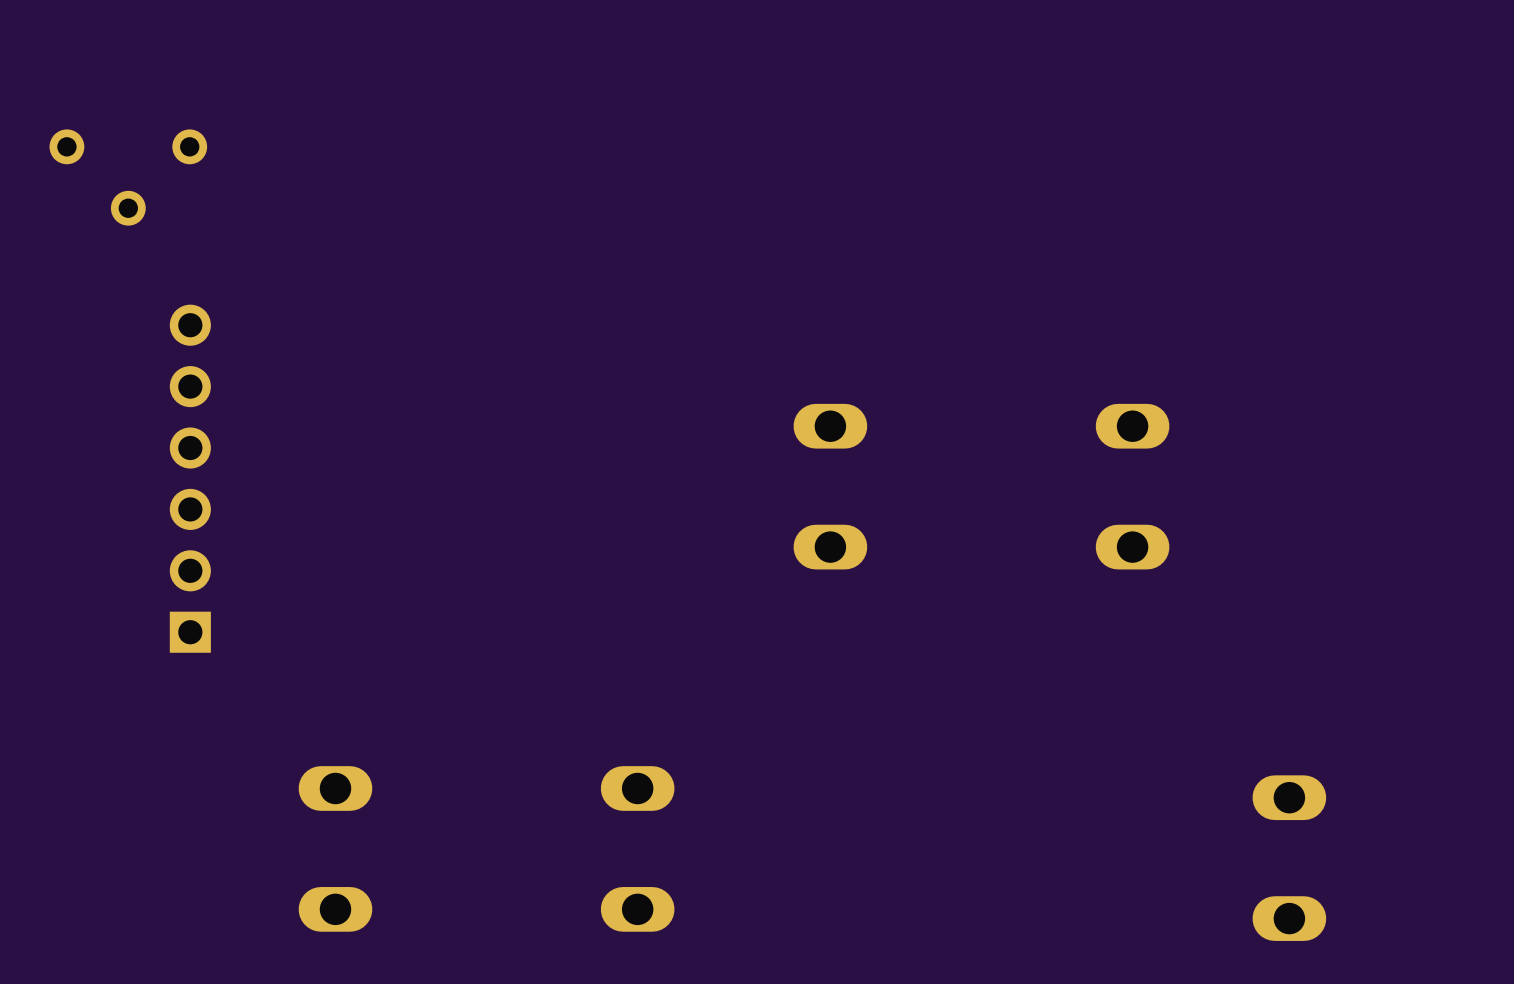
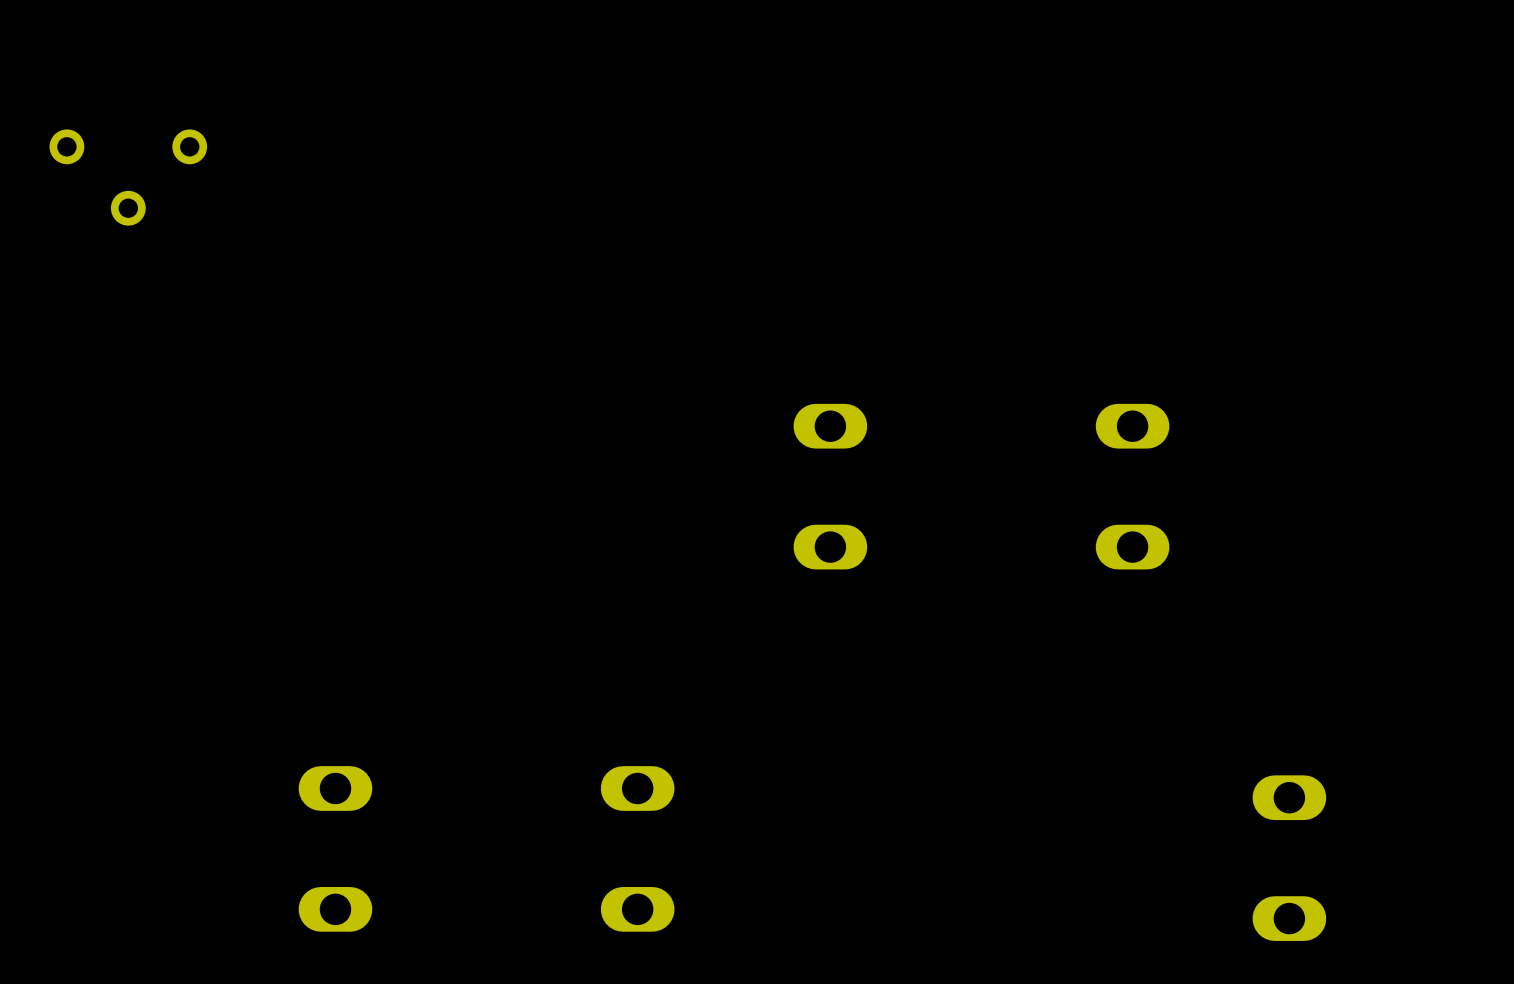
part: (190, 478) -> none

